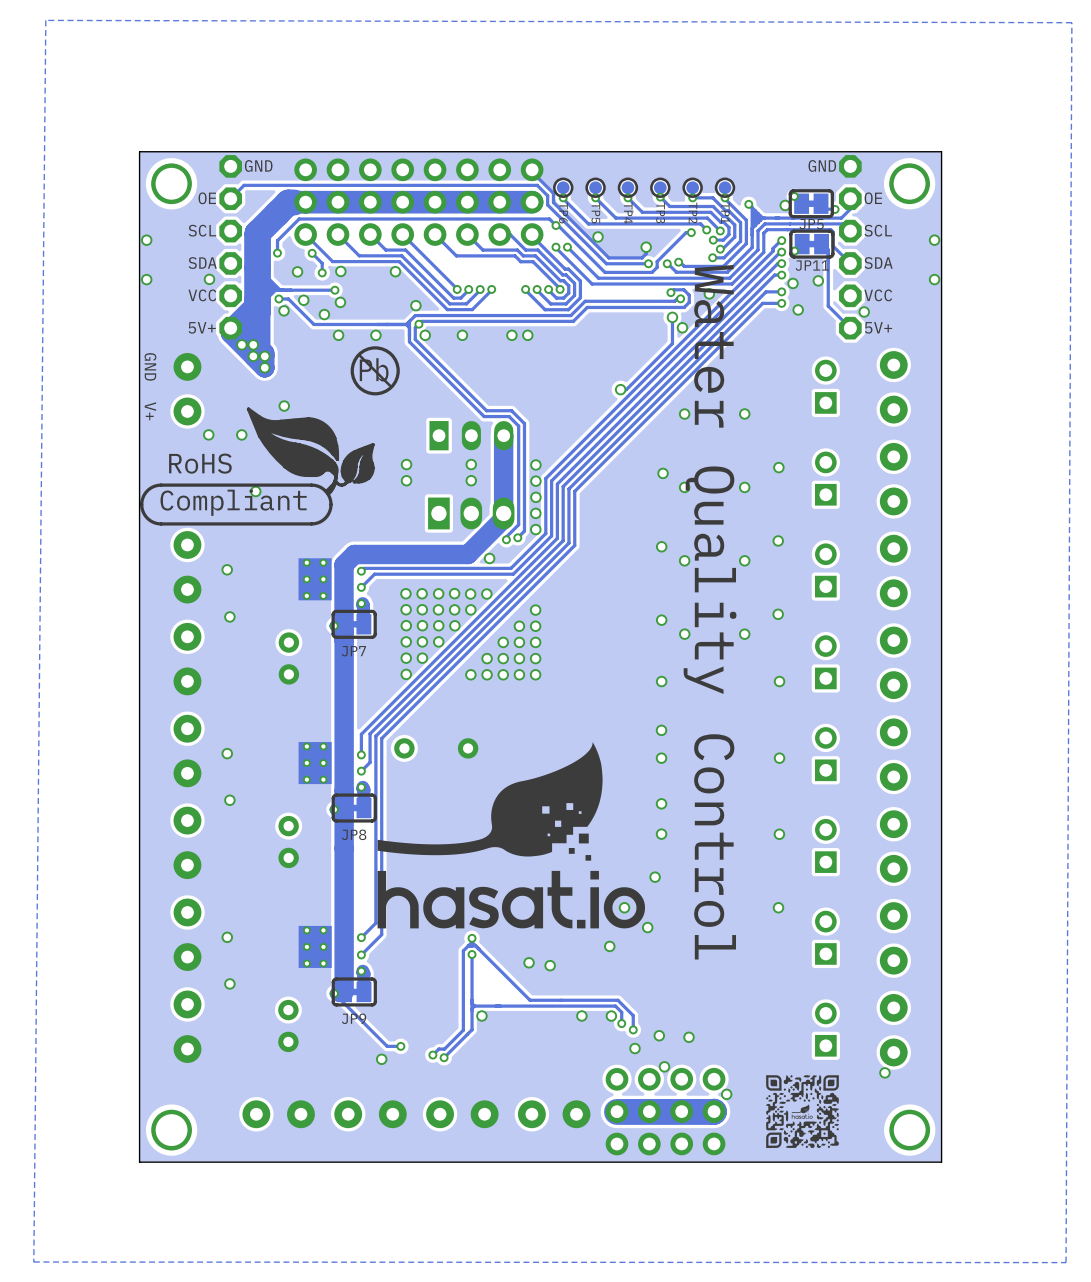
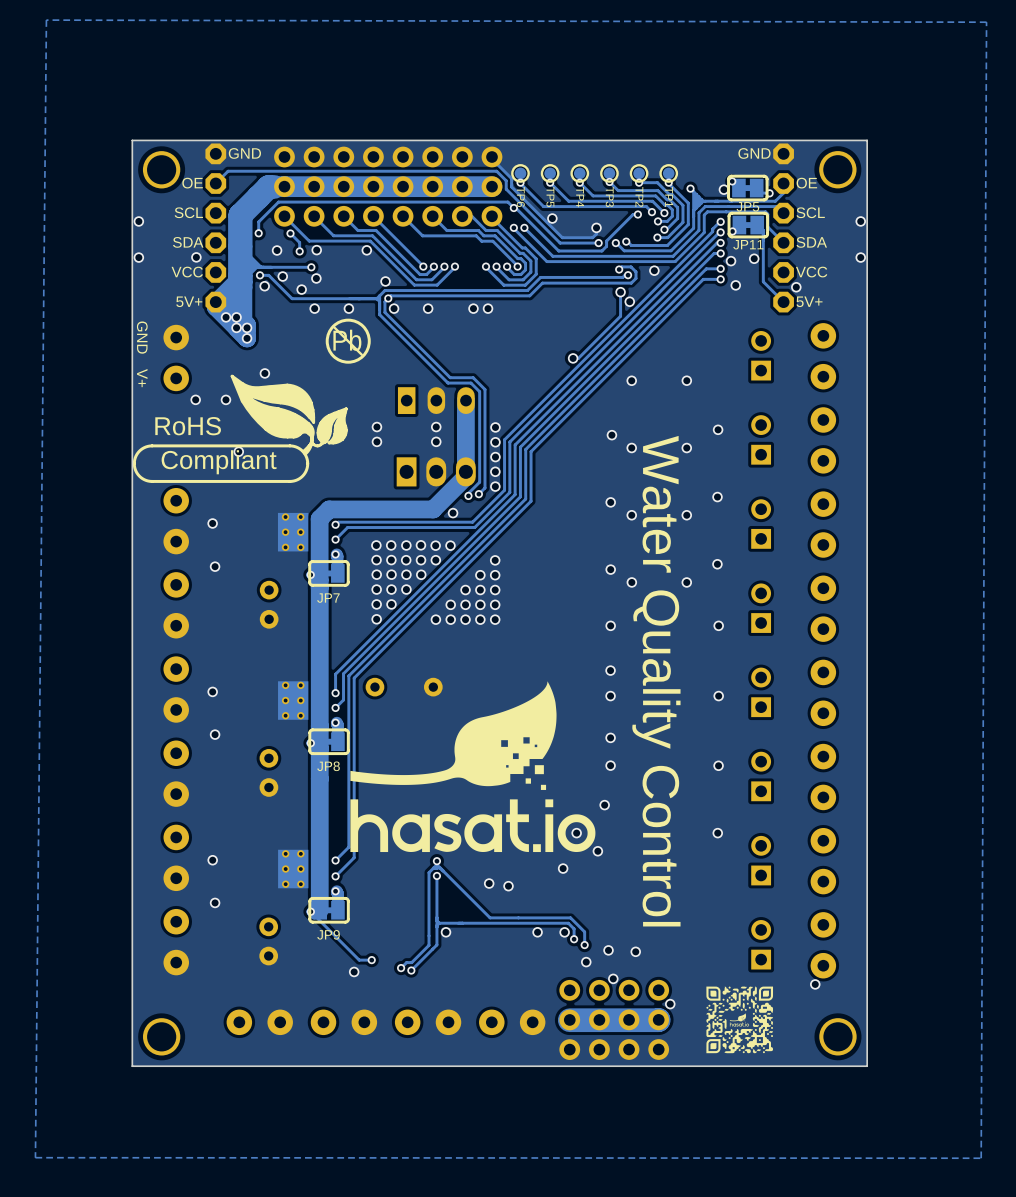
text position: Water Quality Control (710, 612) -> Water Quality Control (656, 681)

